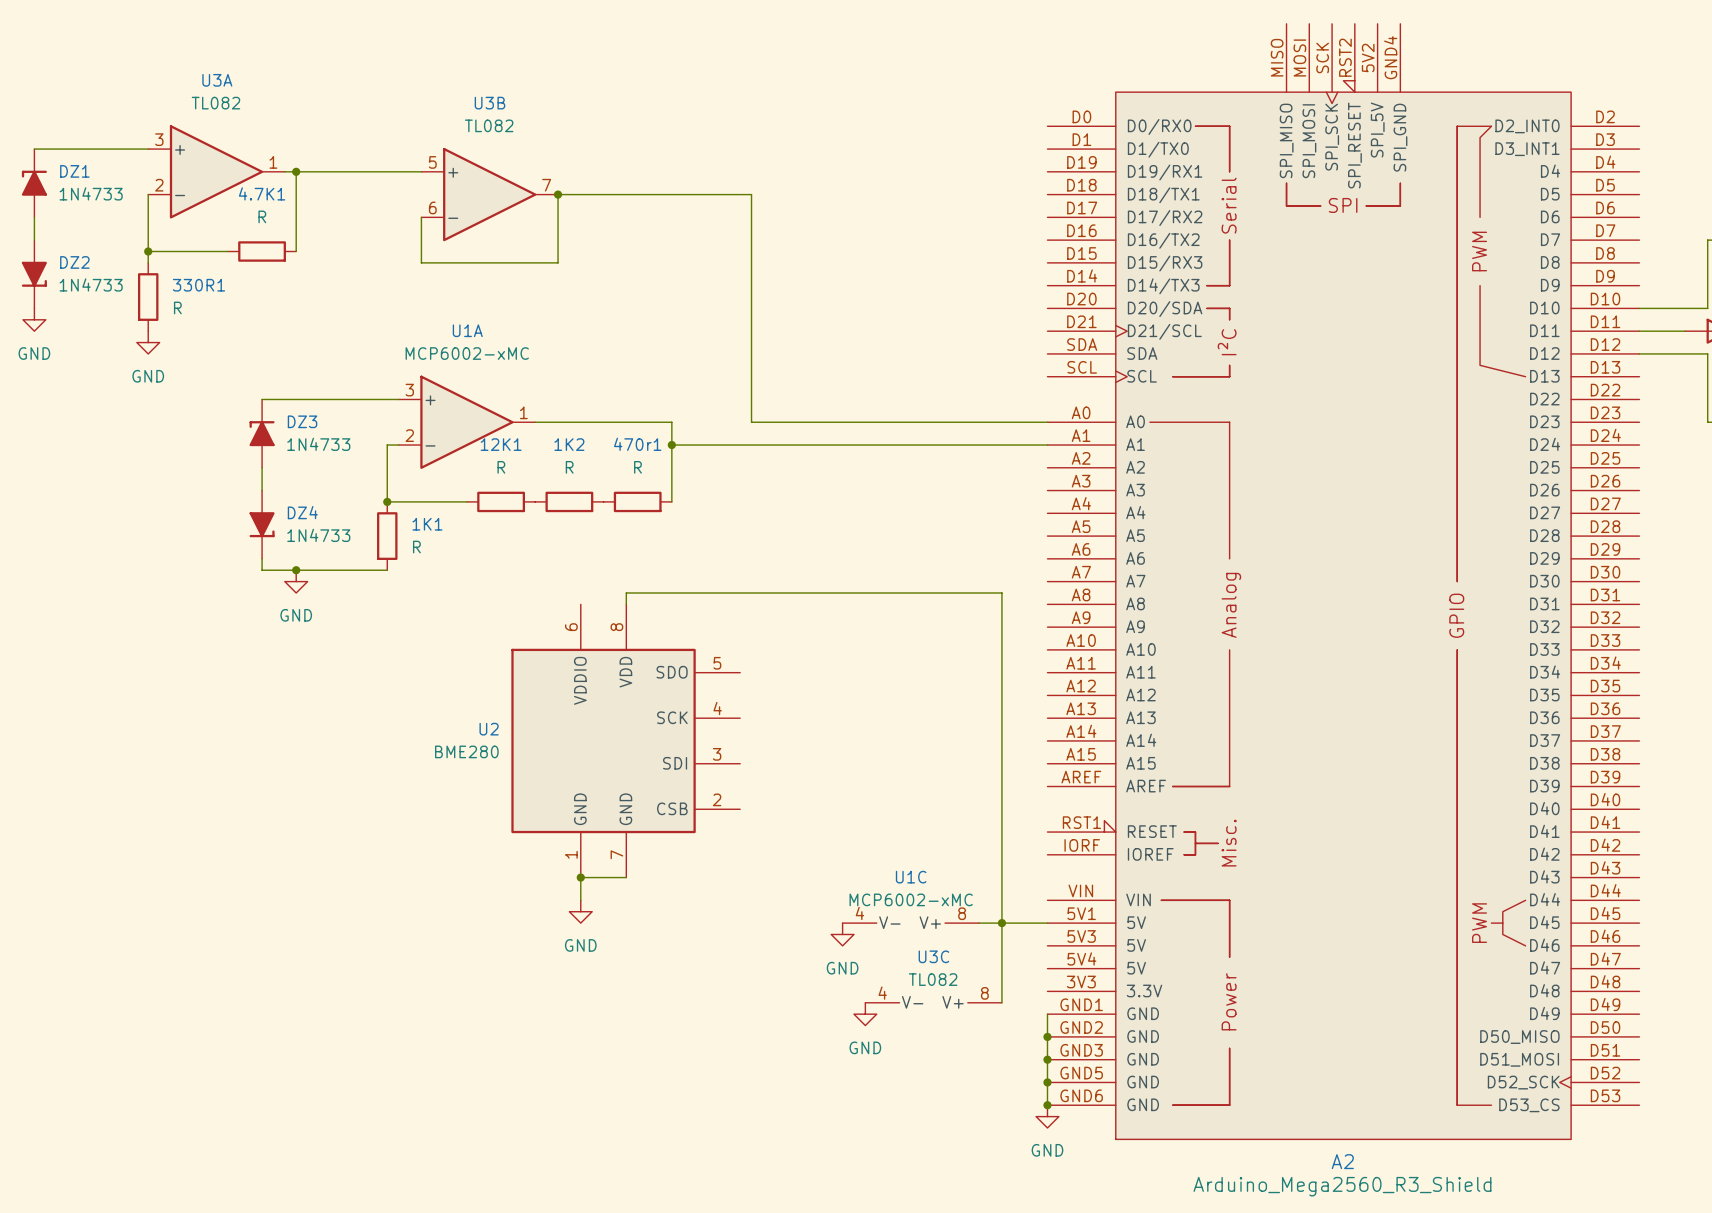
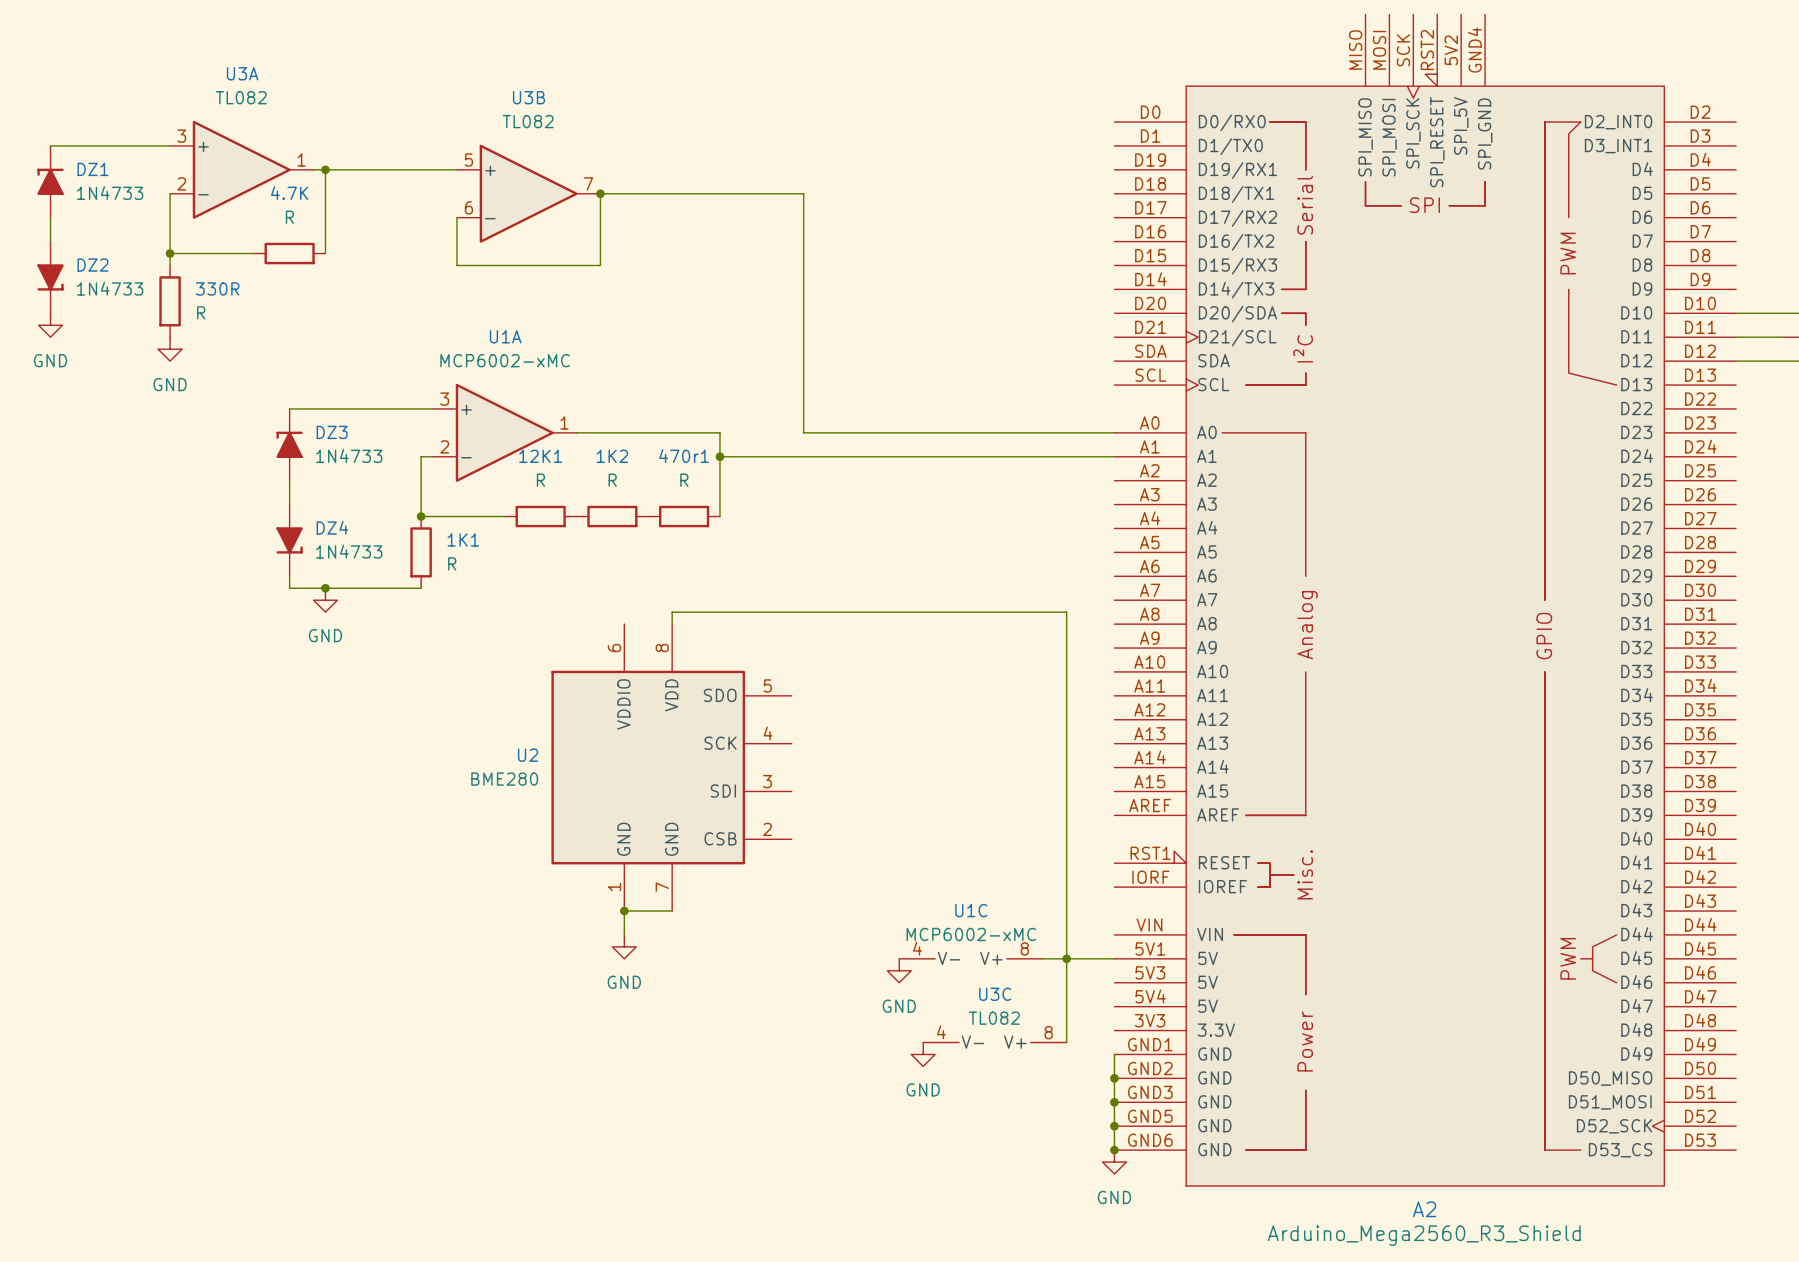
4.7K1 name: 4.7K1 (262, 193) -> 4.7K (289, 193)
330R1 name: 330R1 (198, 285) -> 330R (217, 288)

